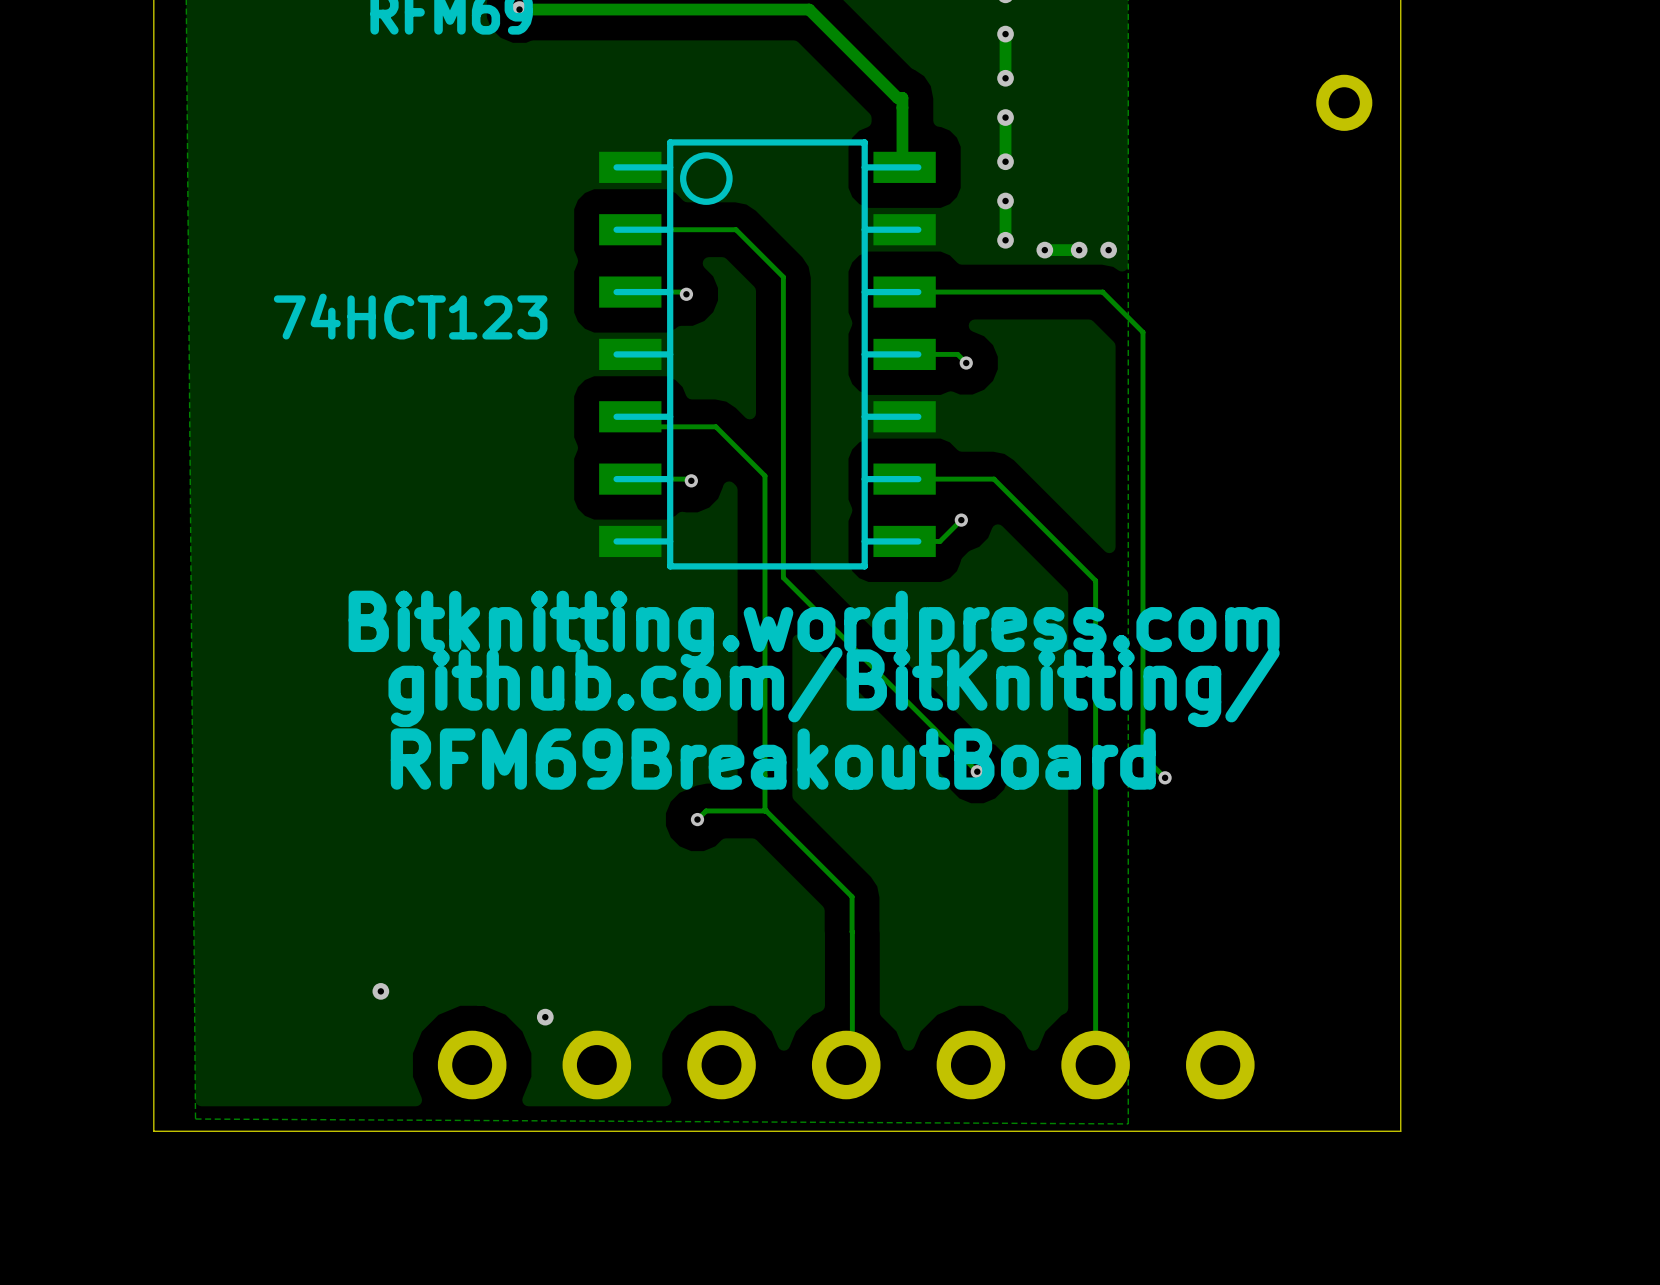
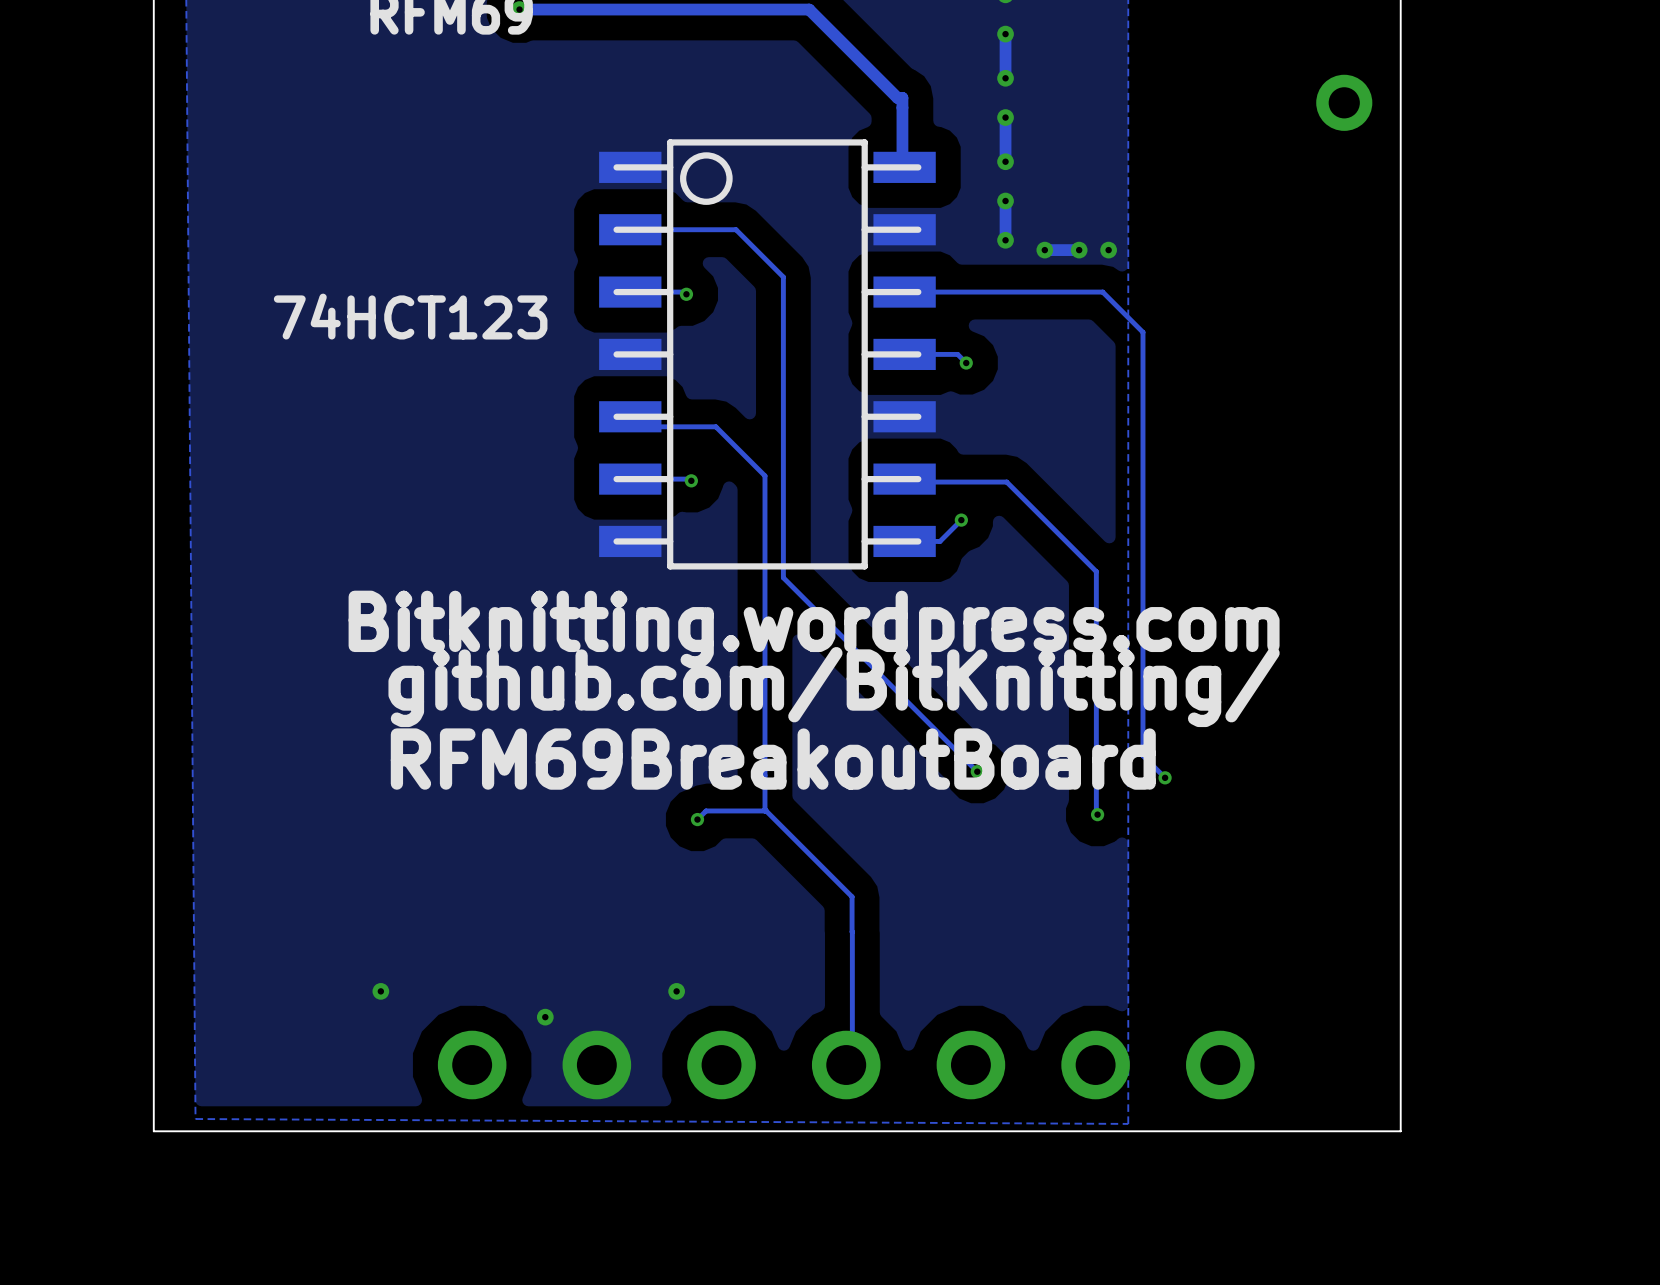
track: (904, 479) (994, 479) (1095, 580) (1095, 1065) -> (904, 479) (907, 482) (1006, 482) (1096, 571) (1097, 814)
via: none -> (1097, 814)
via: none -> (676, 991)

